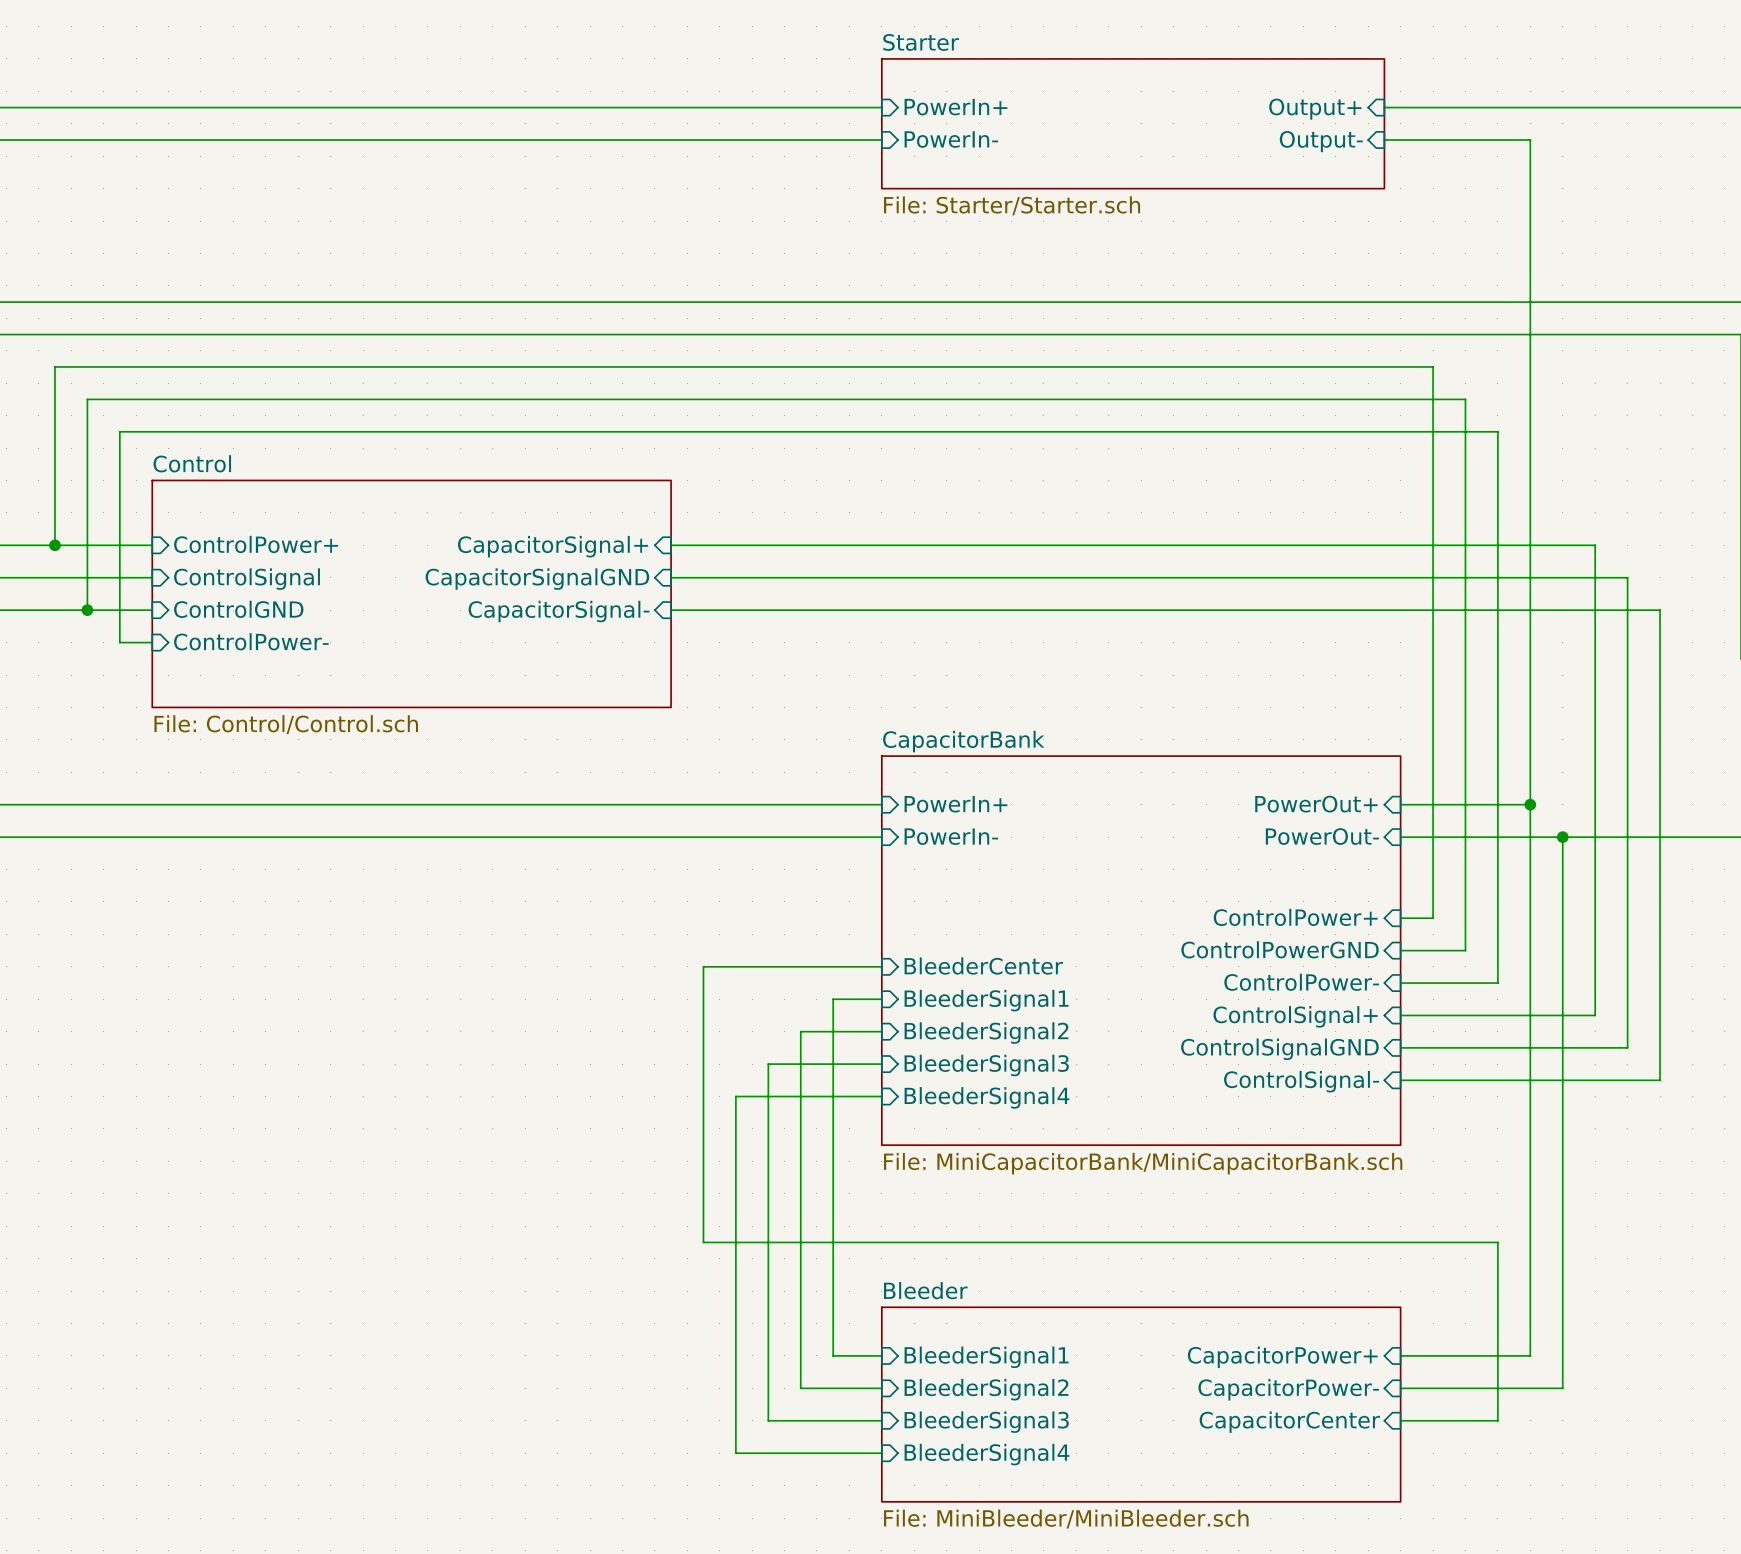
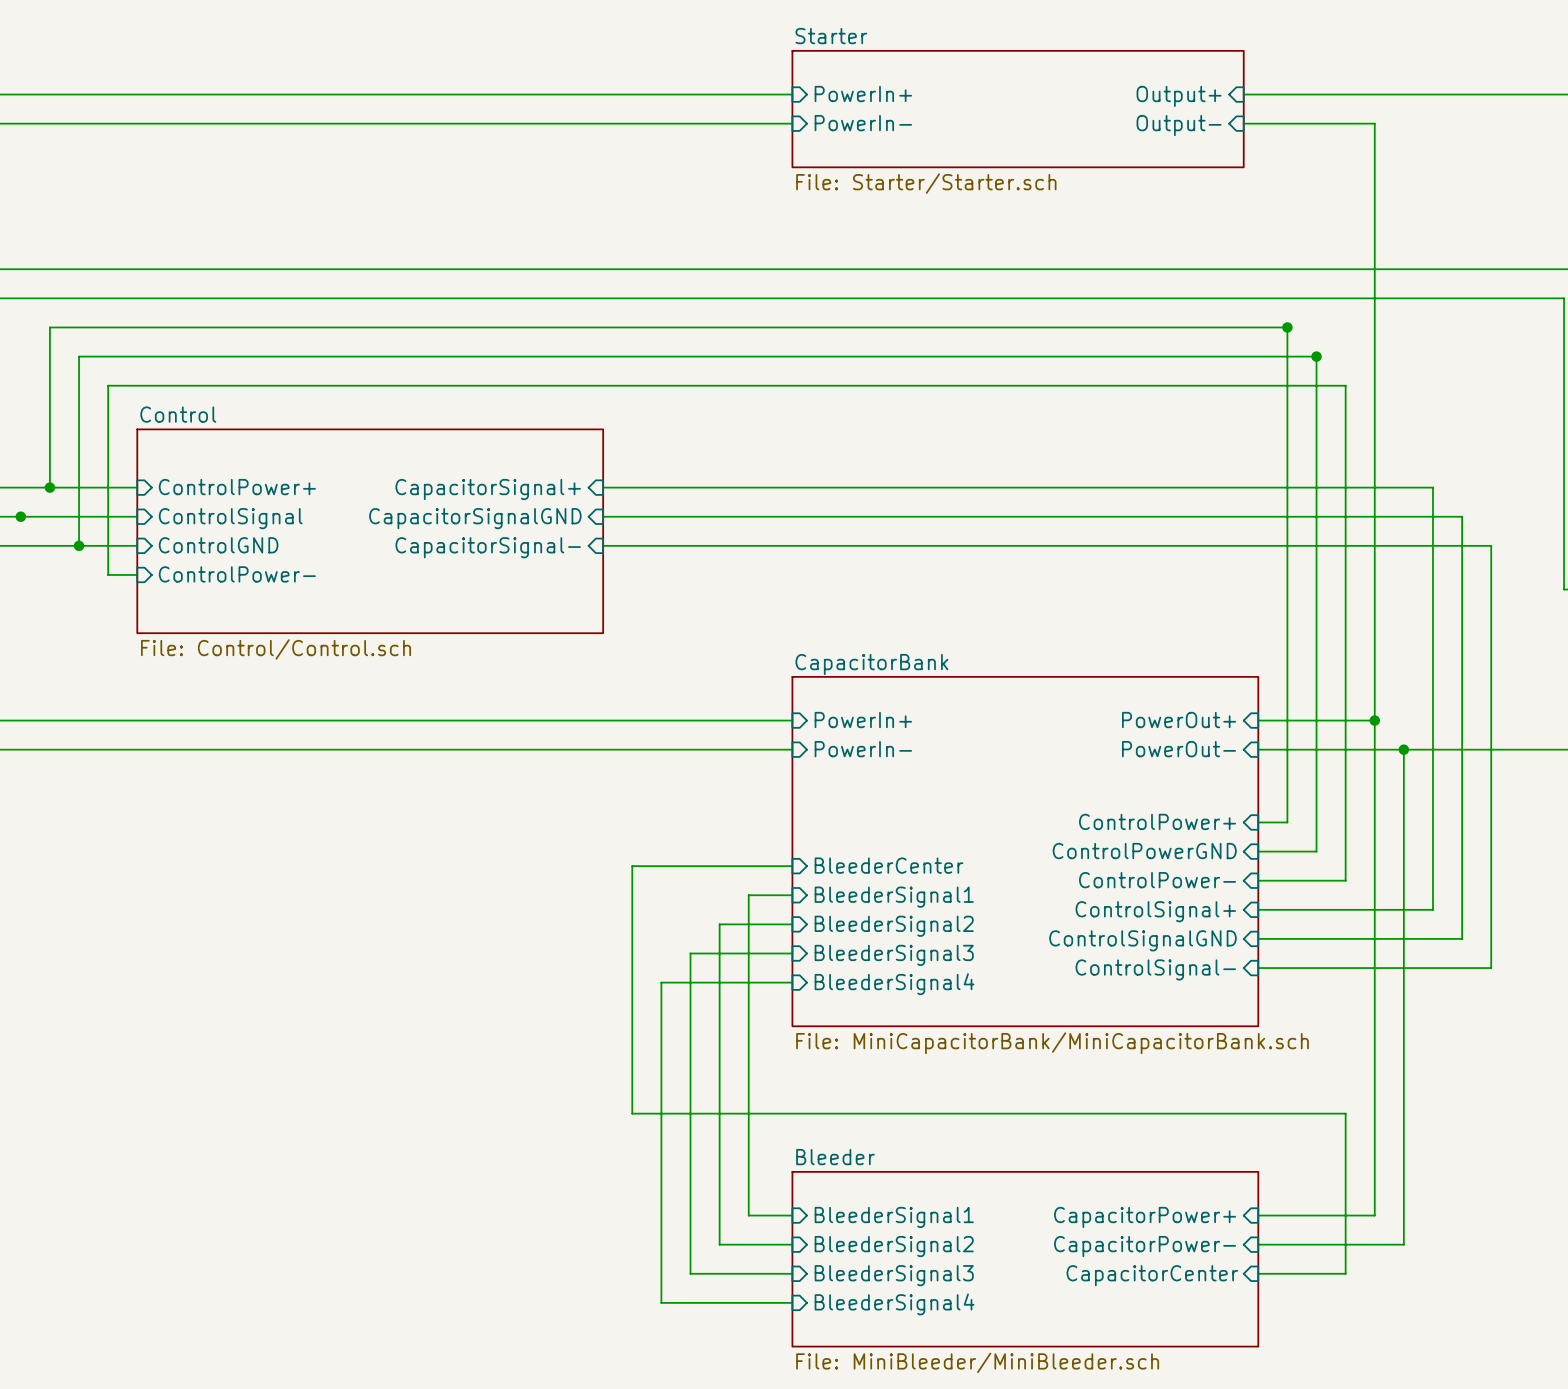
junction: none -> (1287, 327)
junction: none -> (1316, 356)
junction: none -> (20, 516)

